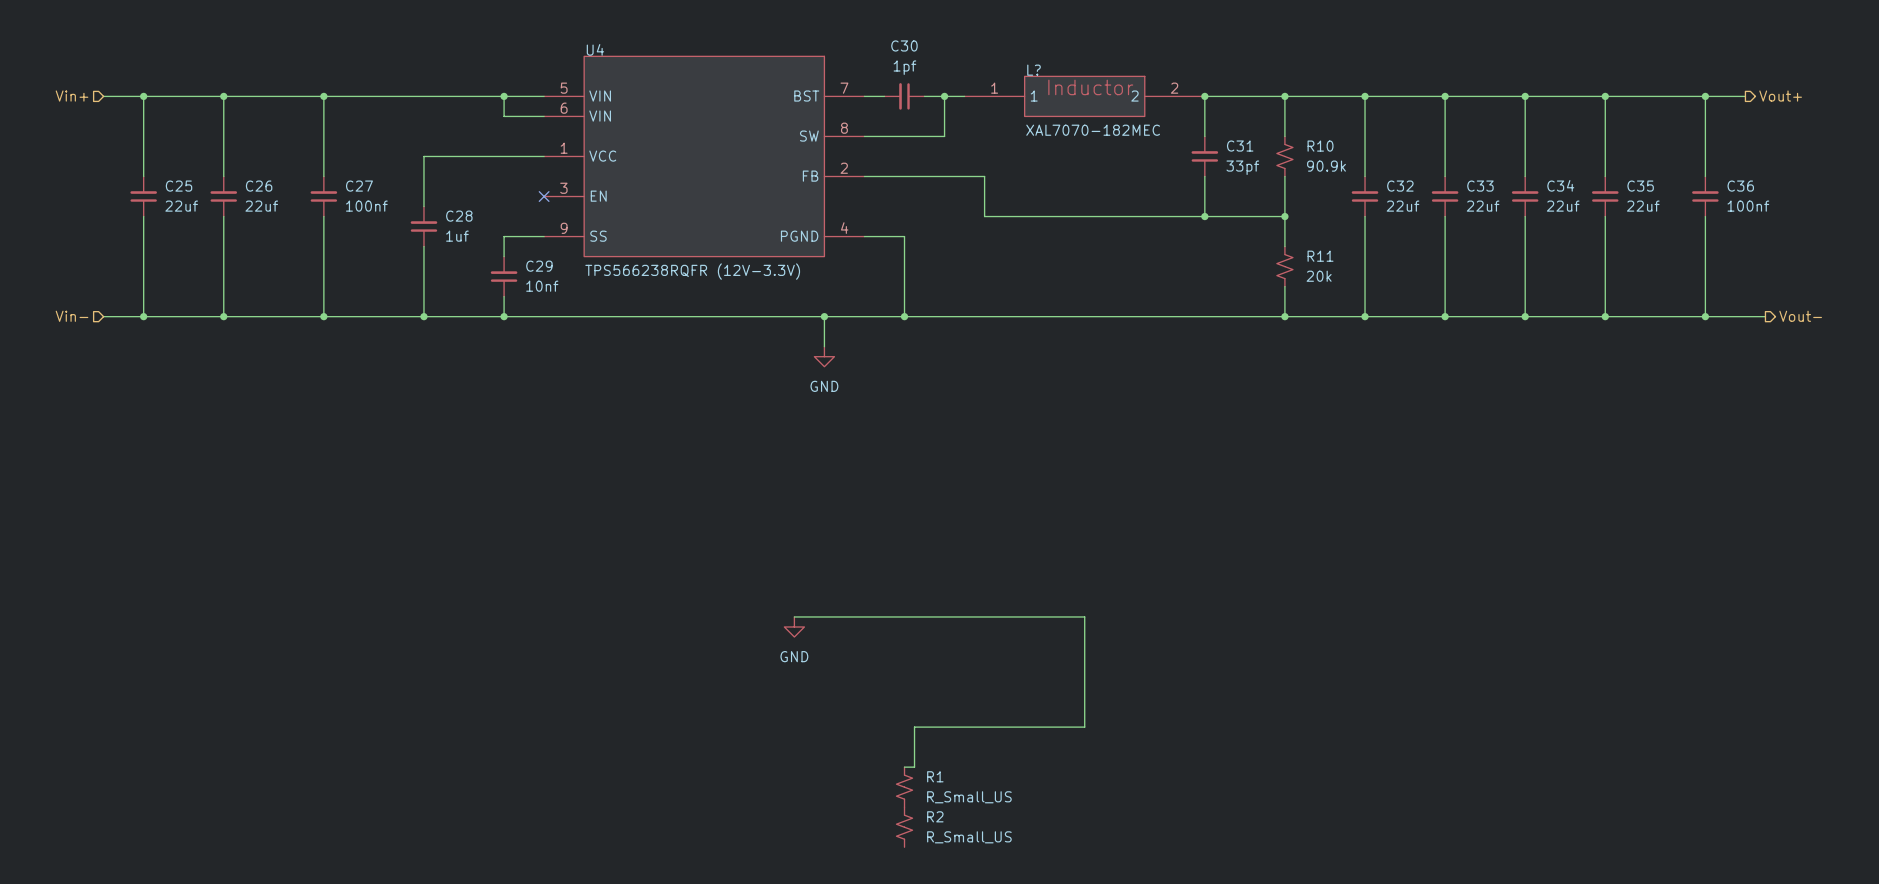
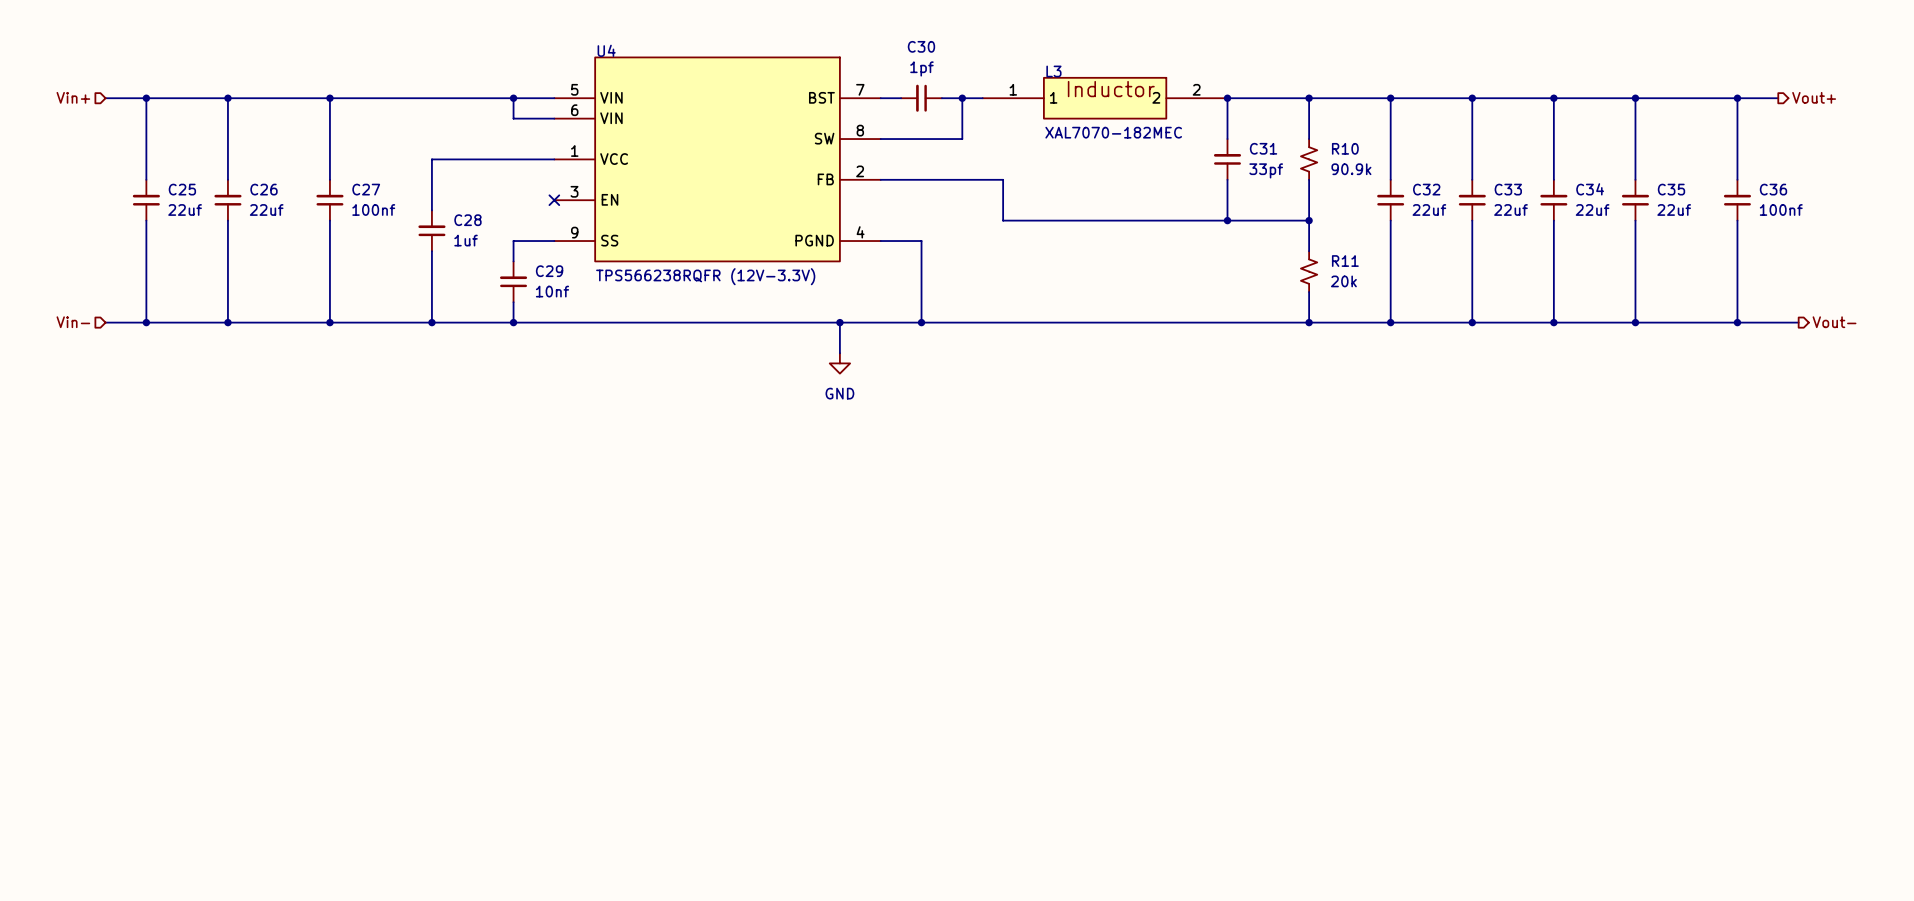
L? name: L? (1034, 70) -> L3 (1053, 71)
wire: (794, 616) (1084, 616) (1084, 727) (914, 727) (914, 767) (904, 767) -> none
power symbol: GND (794, 626) -> none
R1: R_Small_US (904, 787) -> none
R2: R_Small_US (904, 827) -> none

